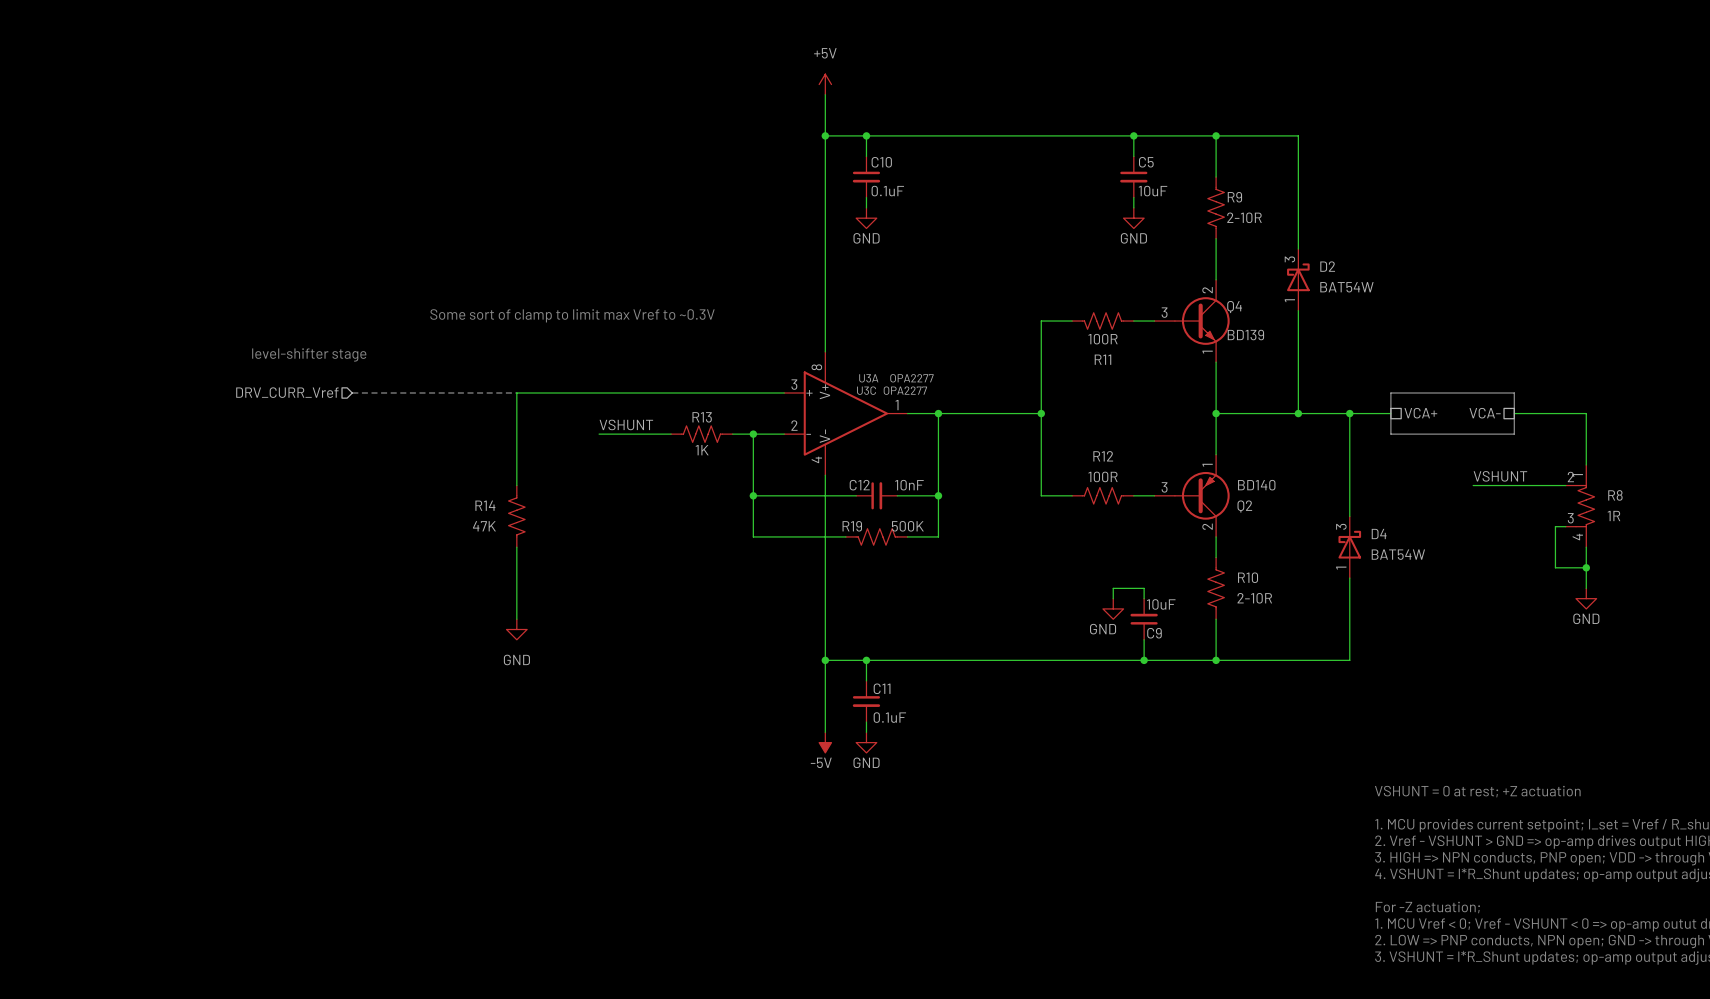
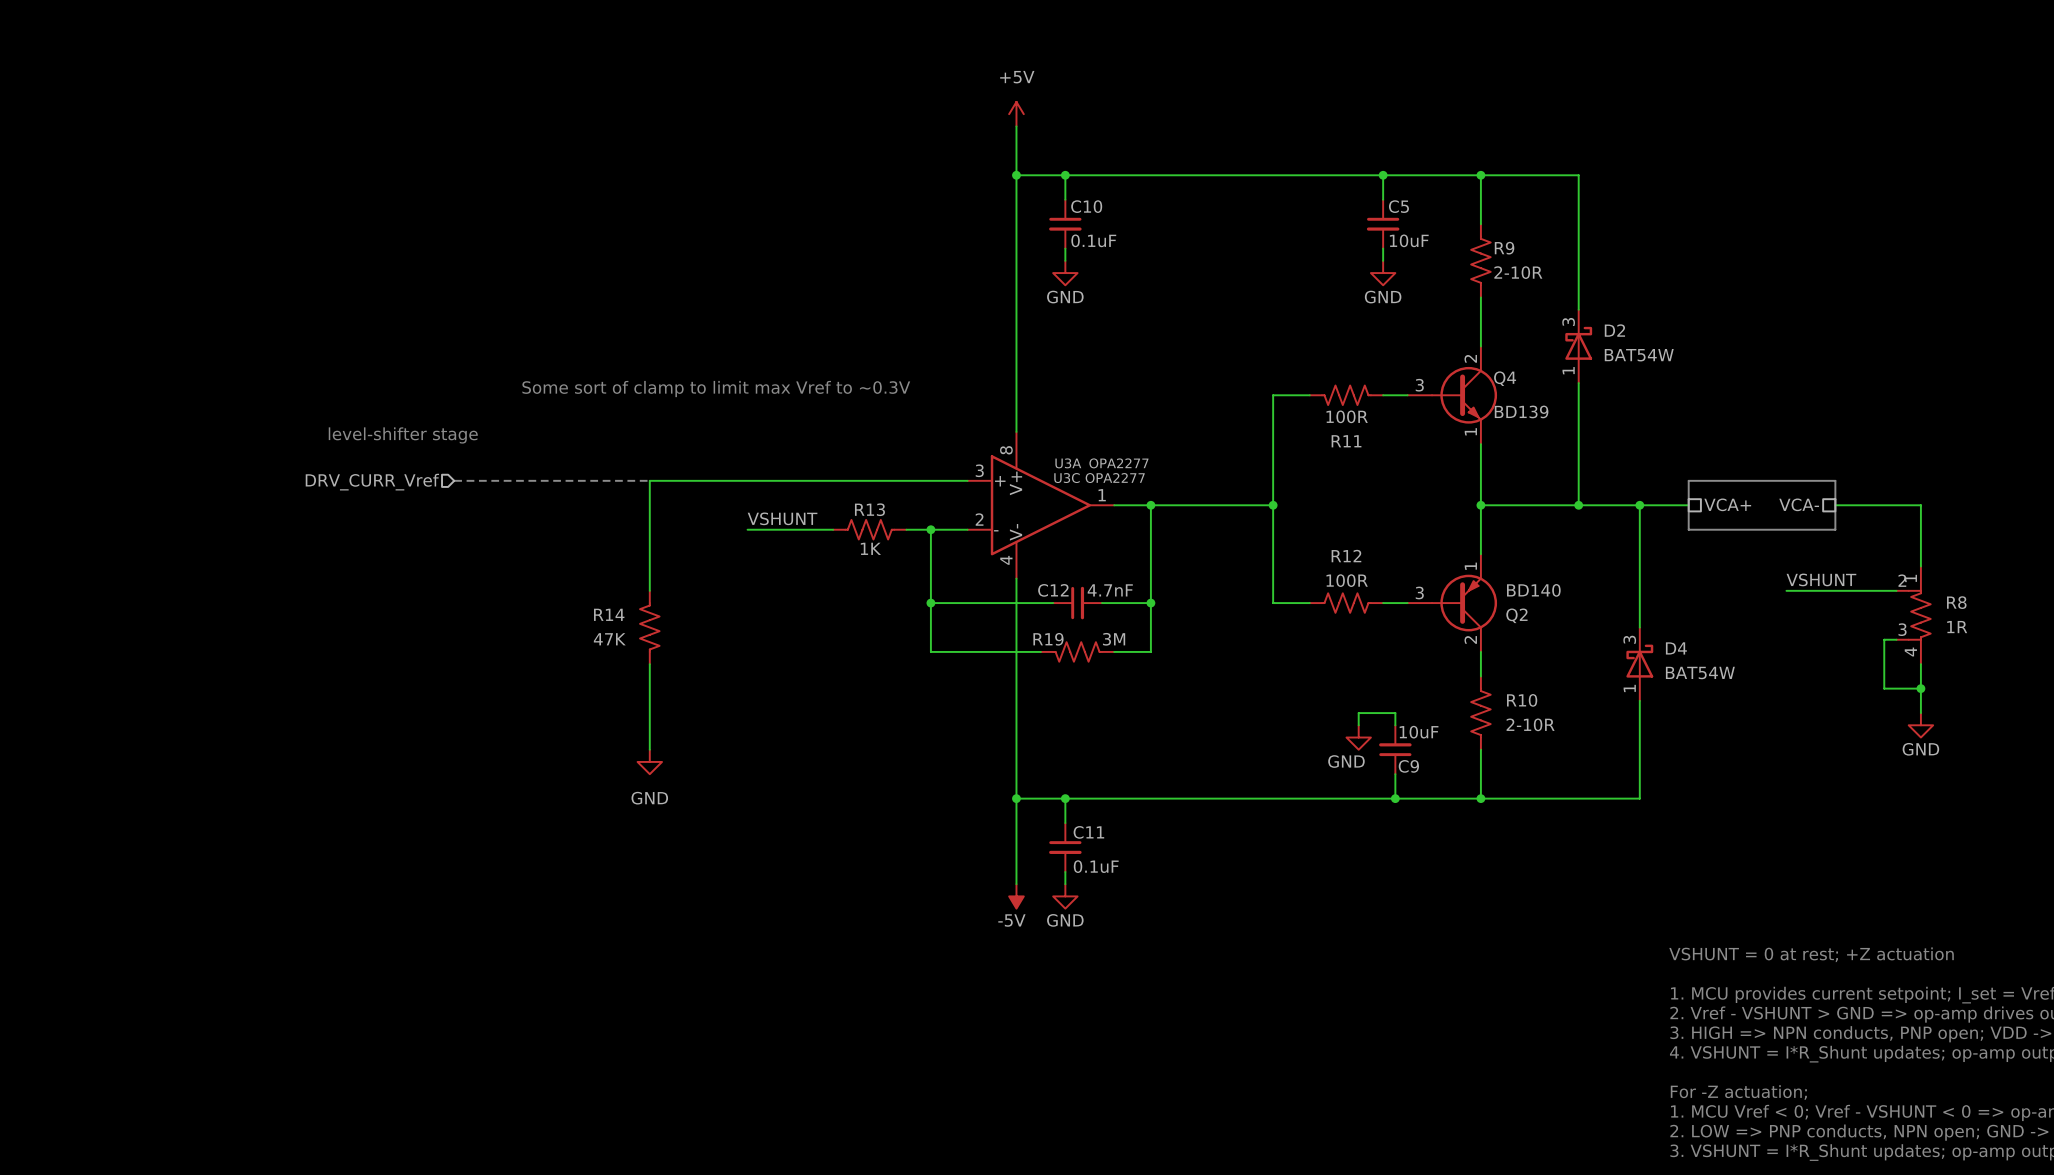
C12 value: 10nF (909, 485) -> 4.7nF (1110, 590)
R19 value: 500K (907, 526) -> 3M (1114, 639)

